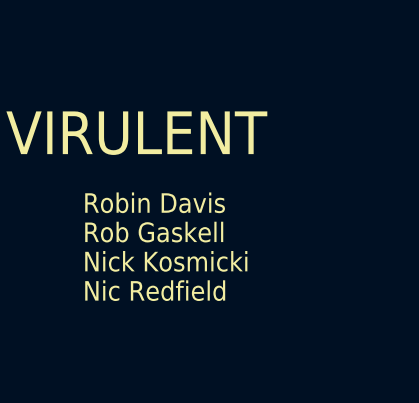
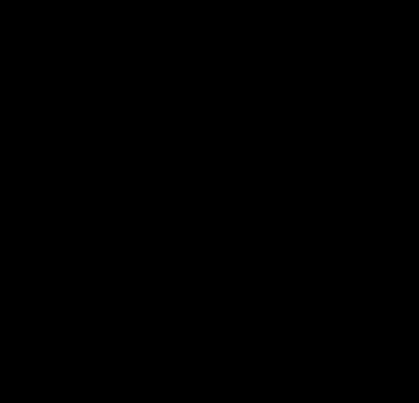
text: VIRULENT (136, 133) -> none
text: Robin Davis (155, 202) -> none
text: Rob Gaskell (154, 232) -> none
text: Nick Kosmicki (166, 261) -> none
text: Nic Redfield (155, 290) -> none

